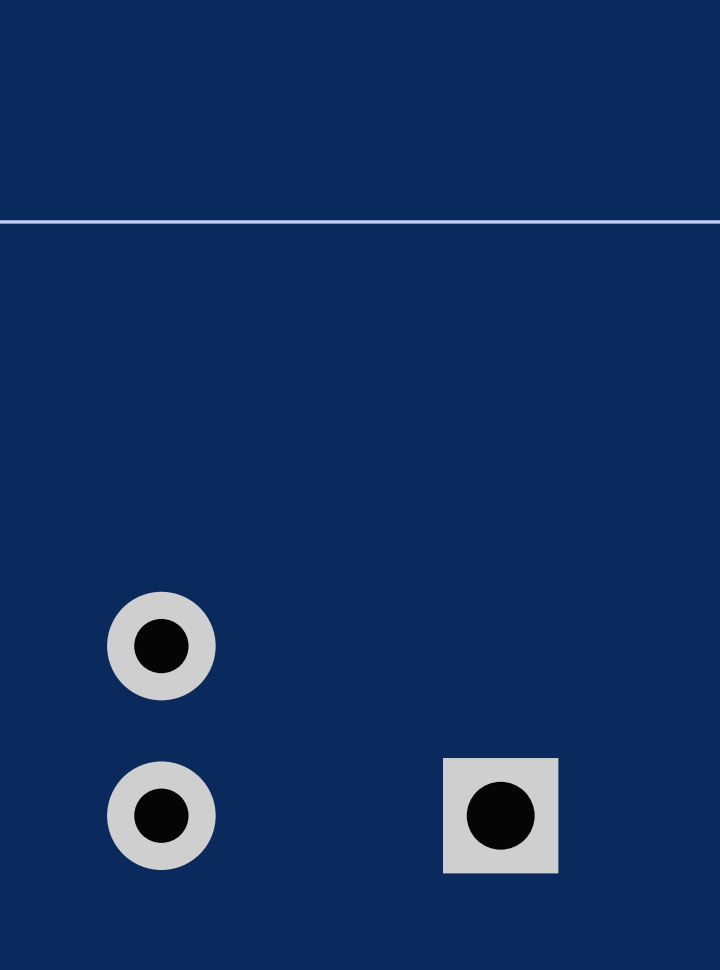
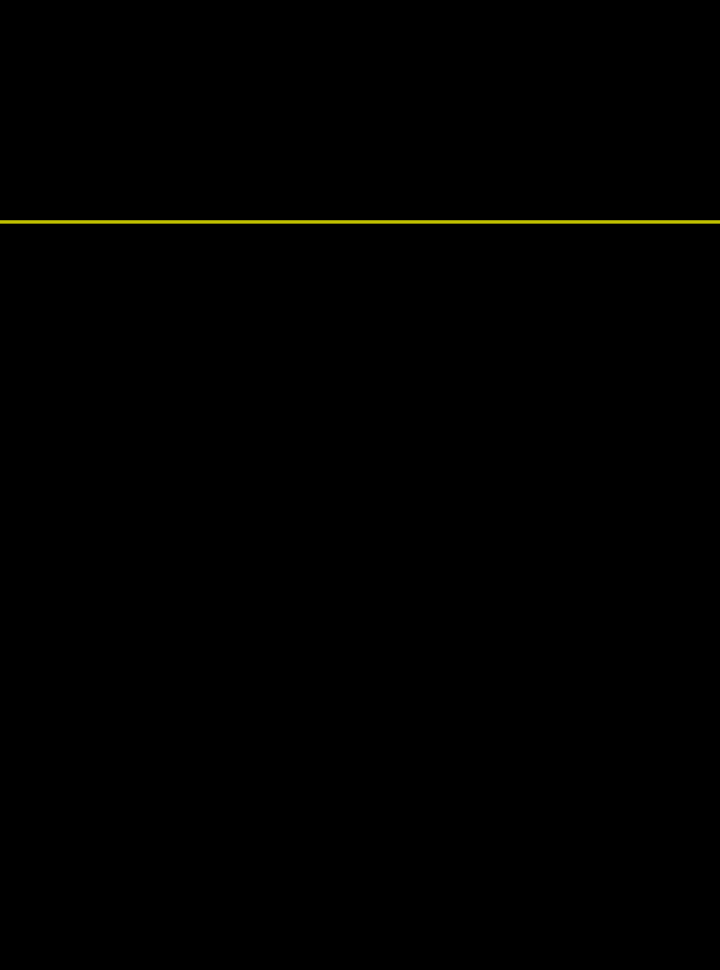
part: (161, 730) -> none
part: (500, 815) -> none

